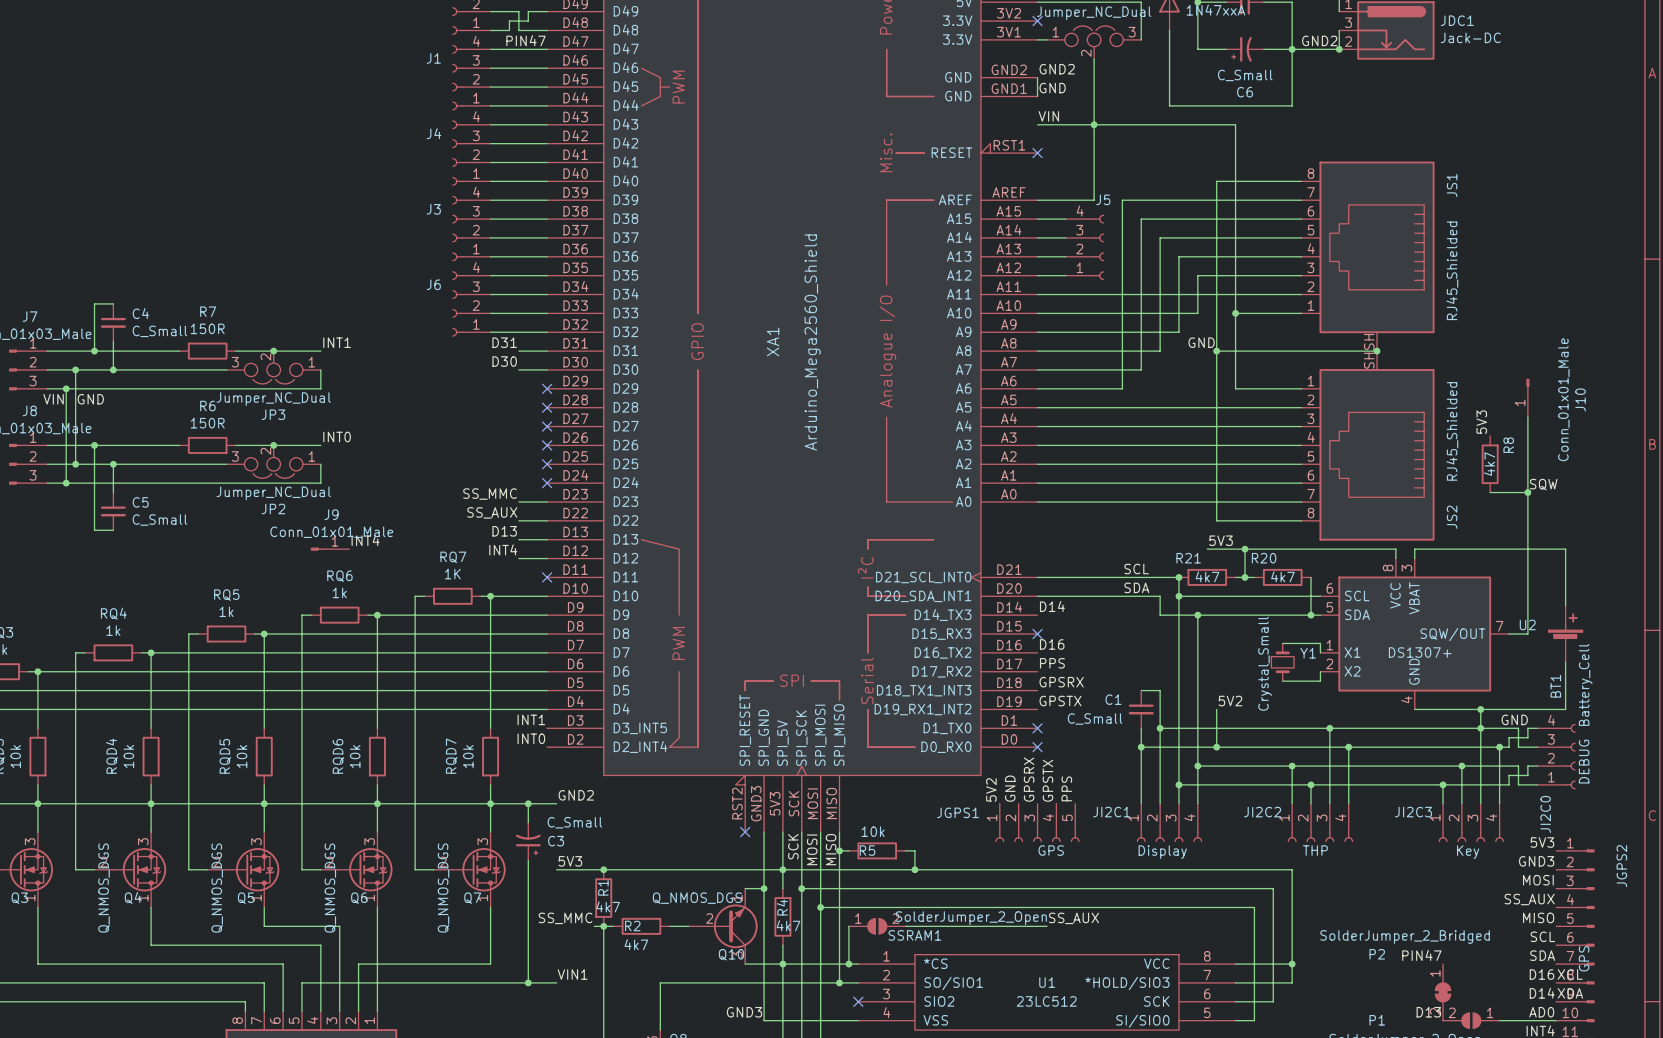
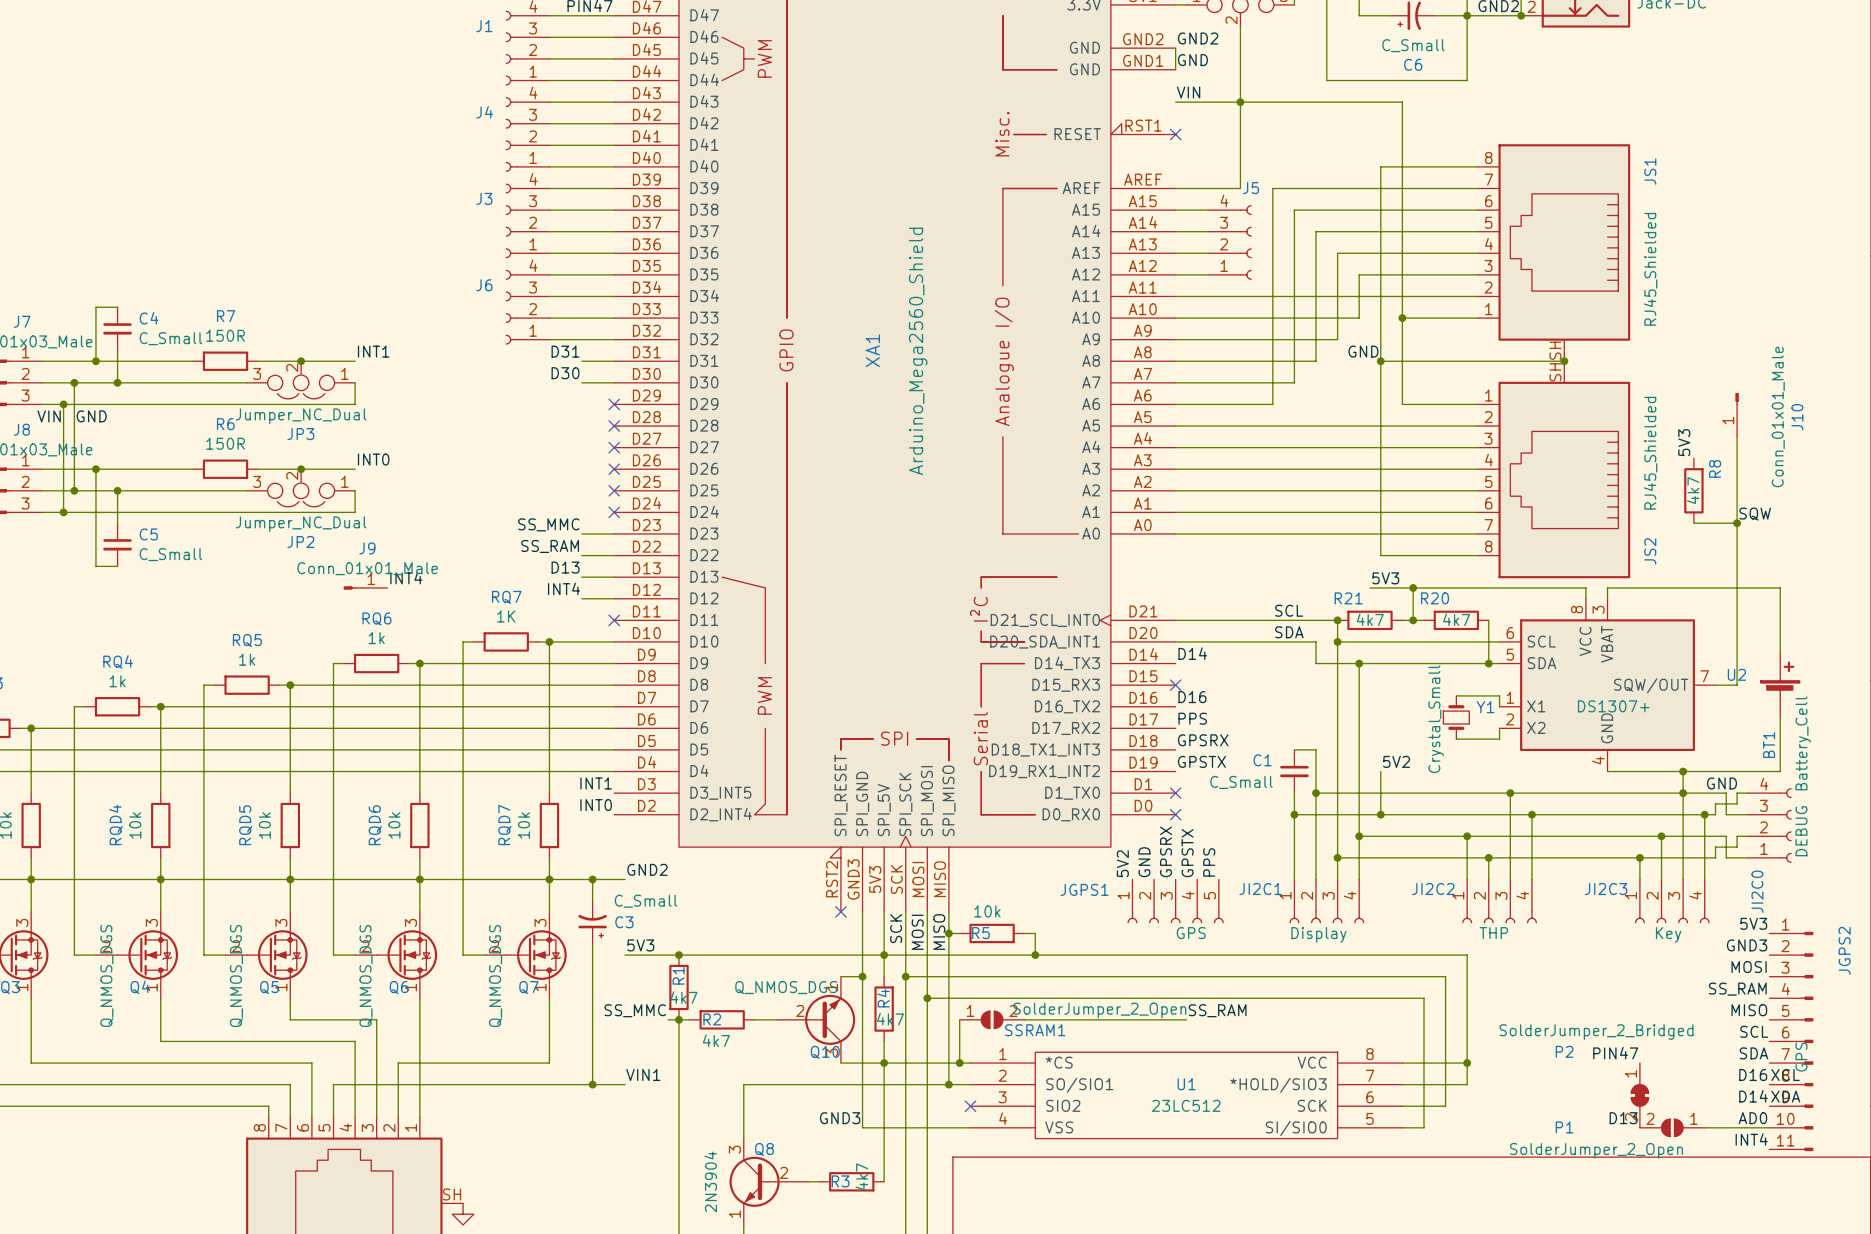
label: SS_AUX (492, 512) -> SS_RAM (550, 546)
label: SS_AUX (1529, 899) -> SS_RAM (1737, 989)
label: SS_AUX (1073, 918) -> SS_RAM (1217, 1010)

